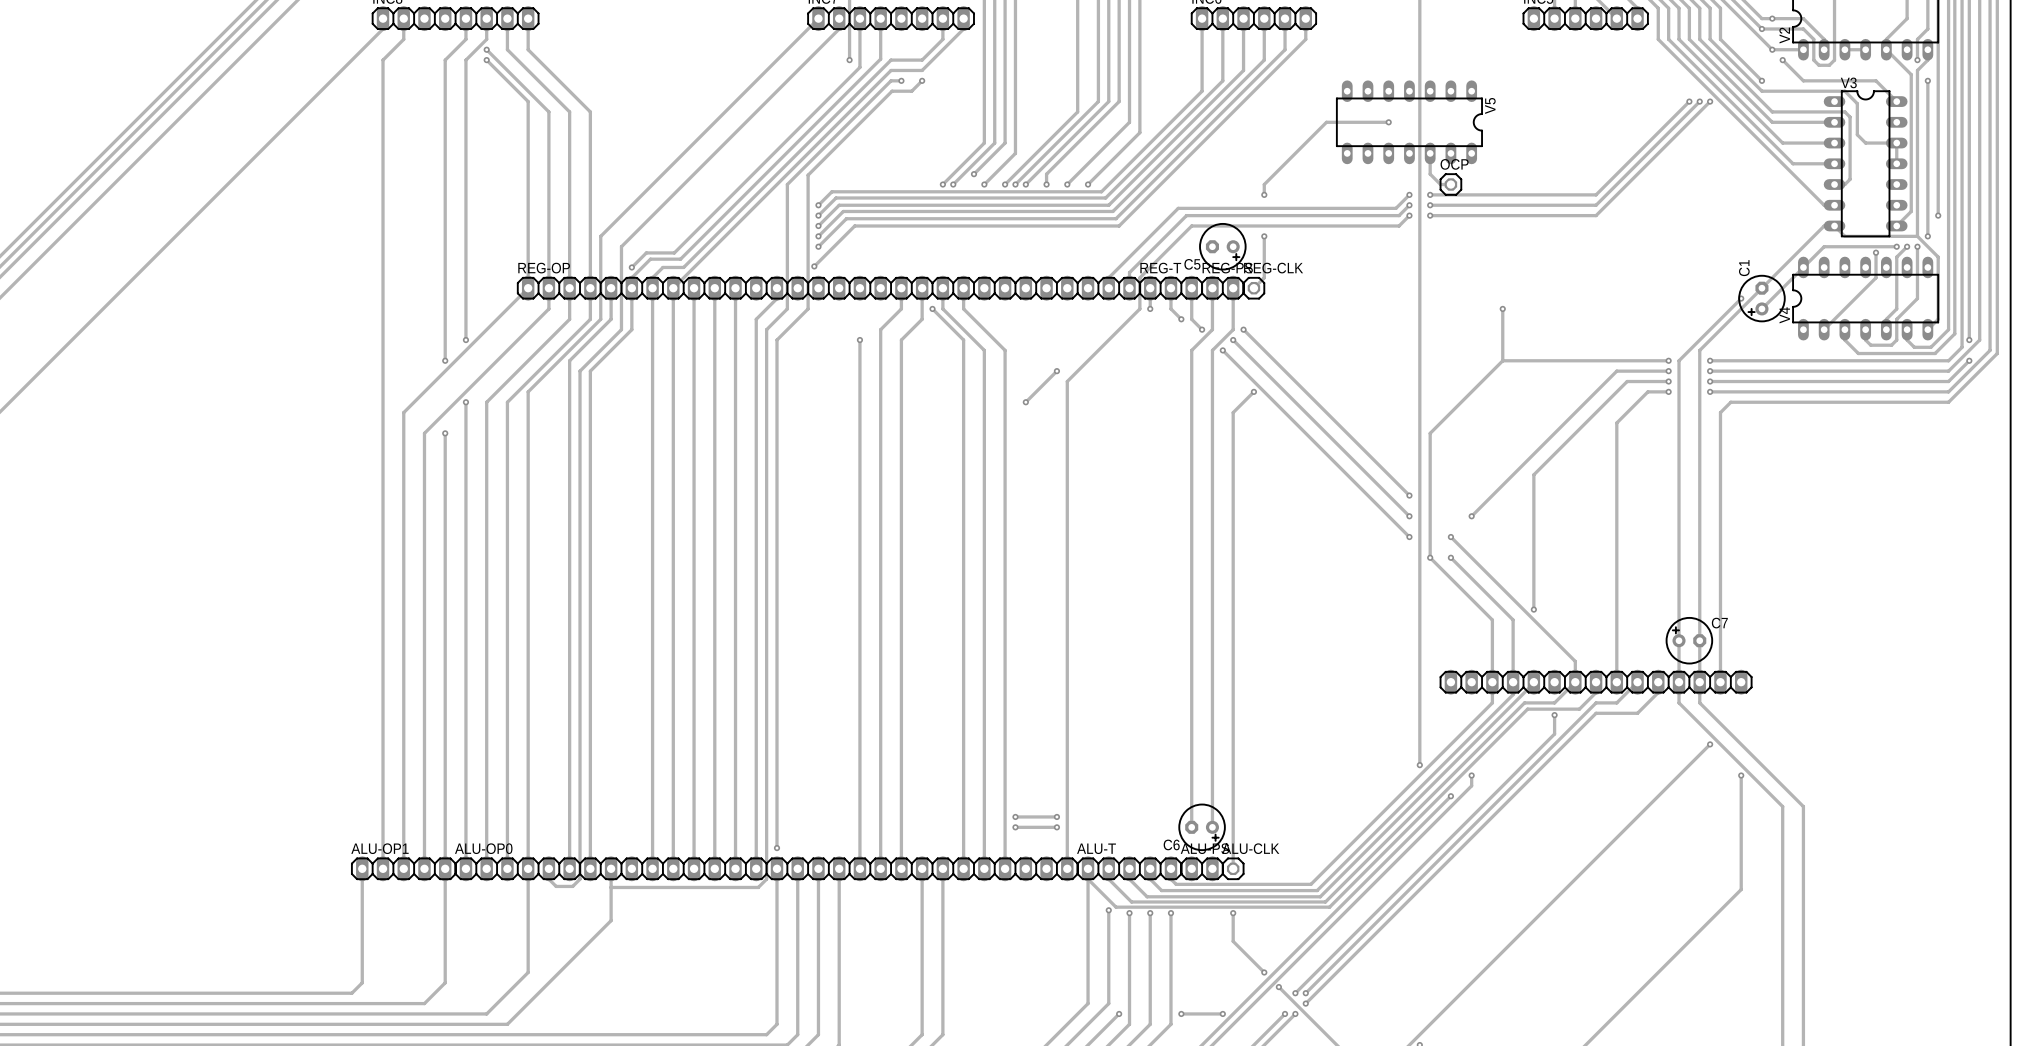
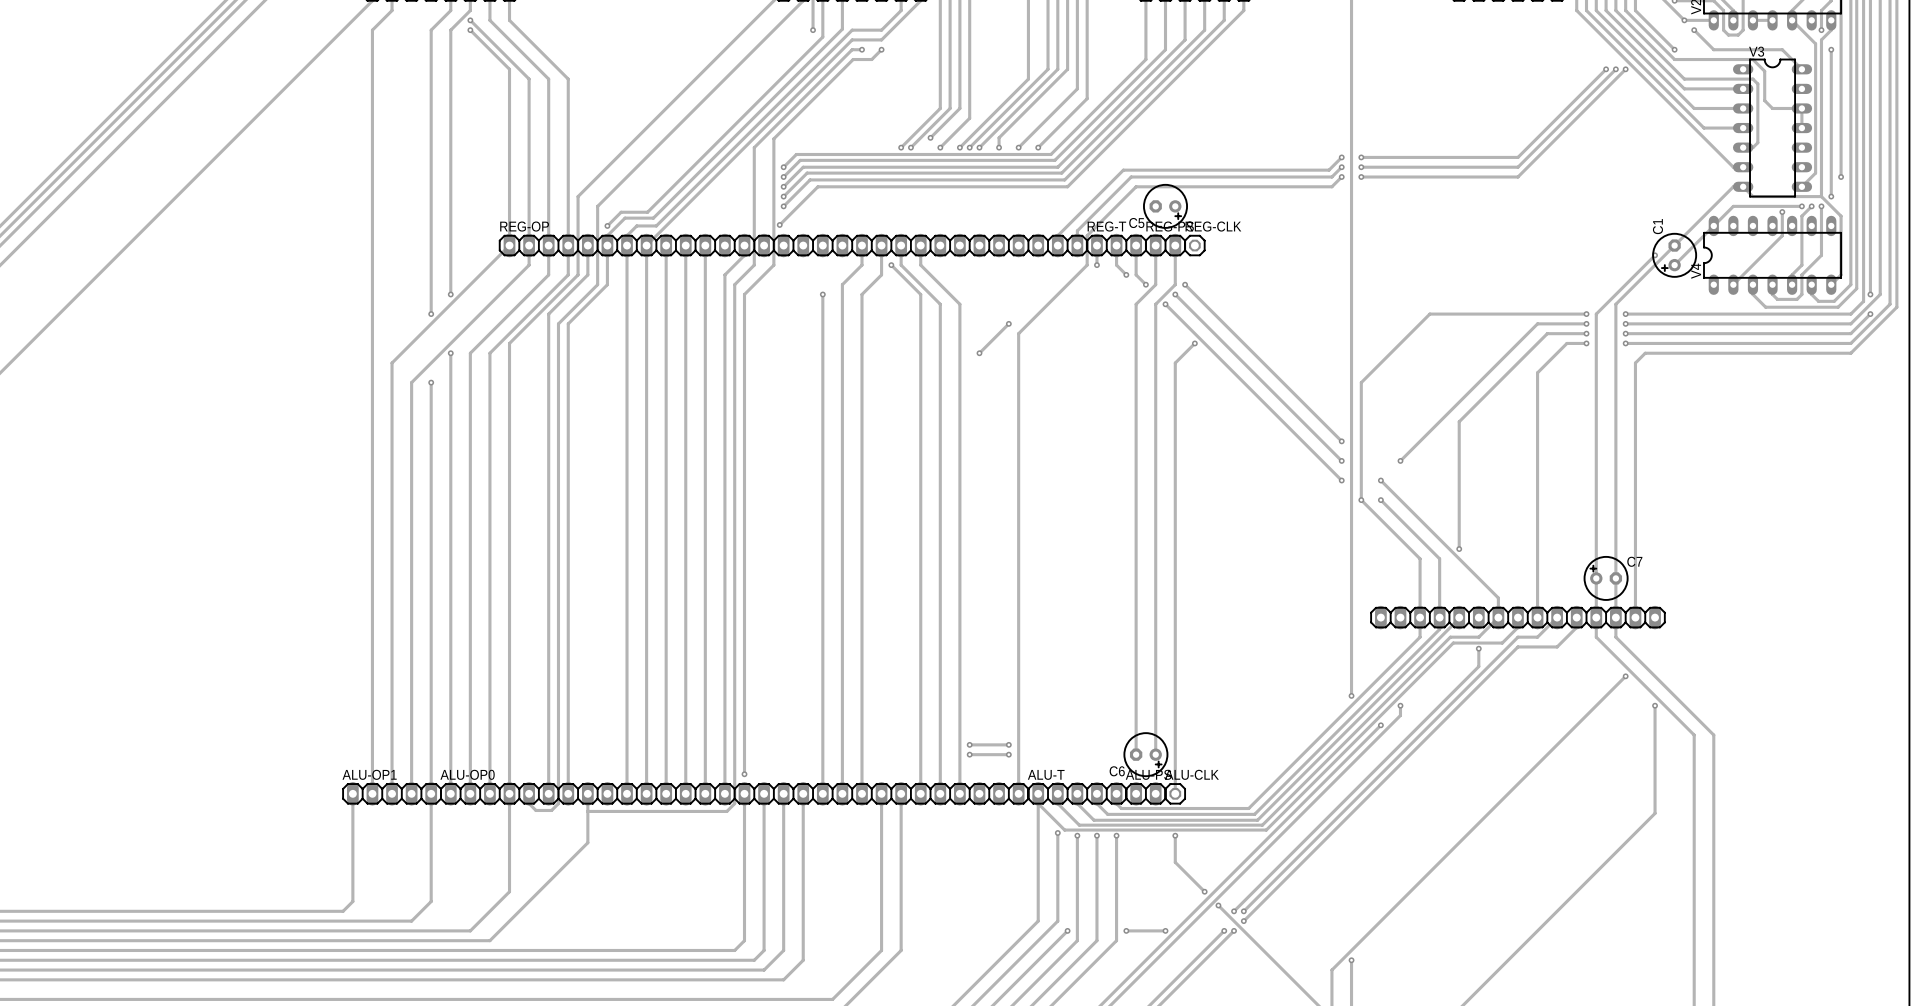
track: (1388, 122) (1326, 122) (1264, 184) (1264, 194) -> none
via: (1388, 122) -> none
V5: (1409, 122) -> none
track: (1430, 153) (1430, 174) (1440, 184) (1450, 184) -> none
OCP: (1450, 184) -> none
via: (1264, 194) -> none
track: (1264, 236) (1264, 277) (1253, 288) -> none
via: (1264, 236) -> none
track: (1502, 308) (1502, 360) -> none
via: (1502, 308) -> none

